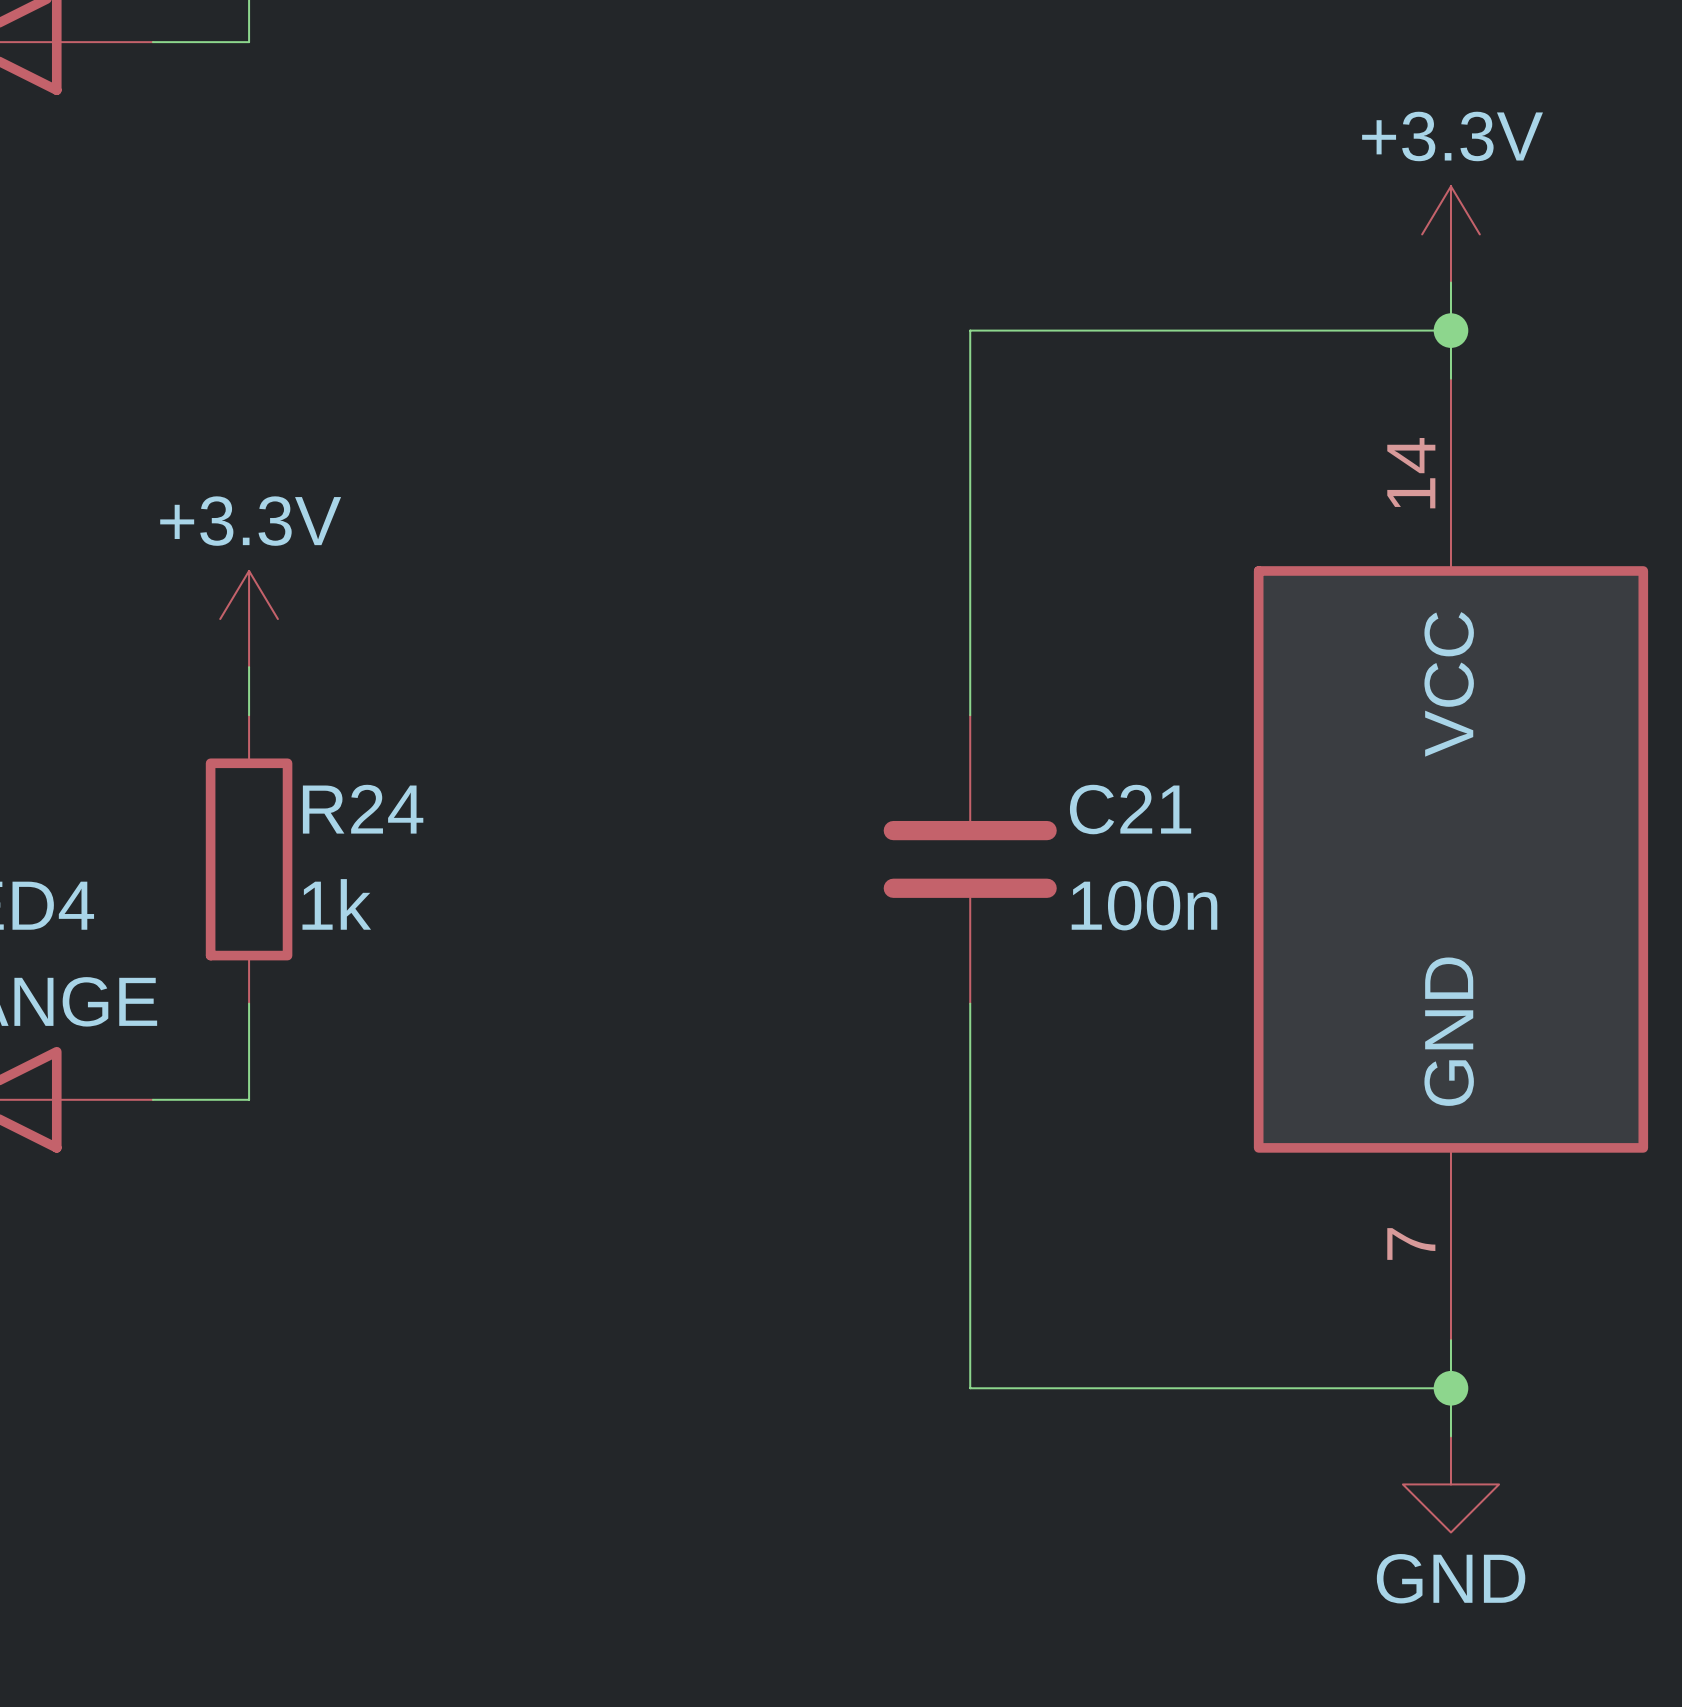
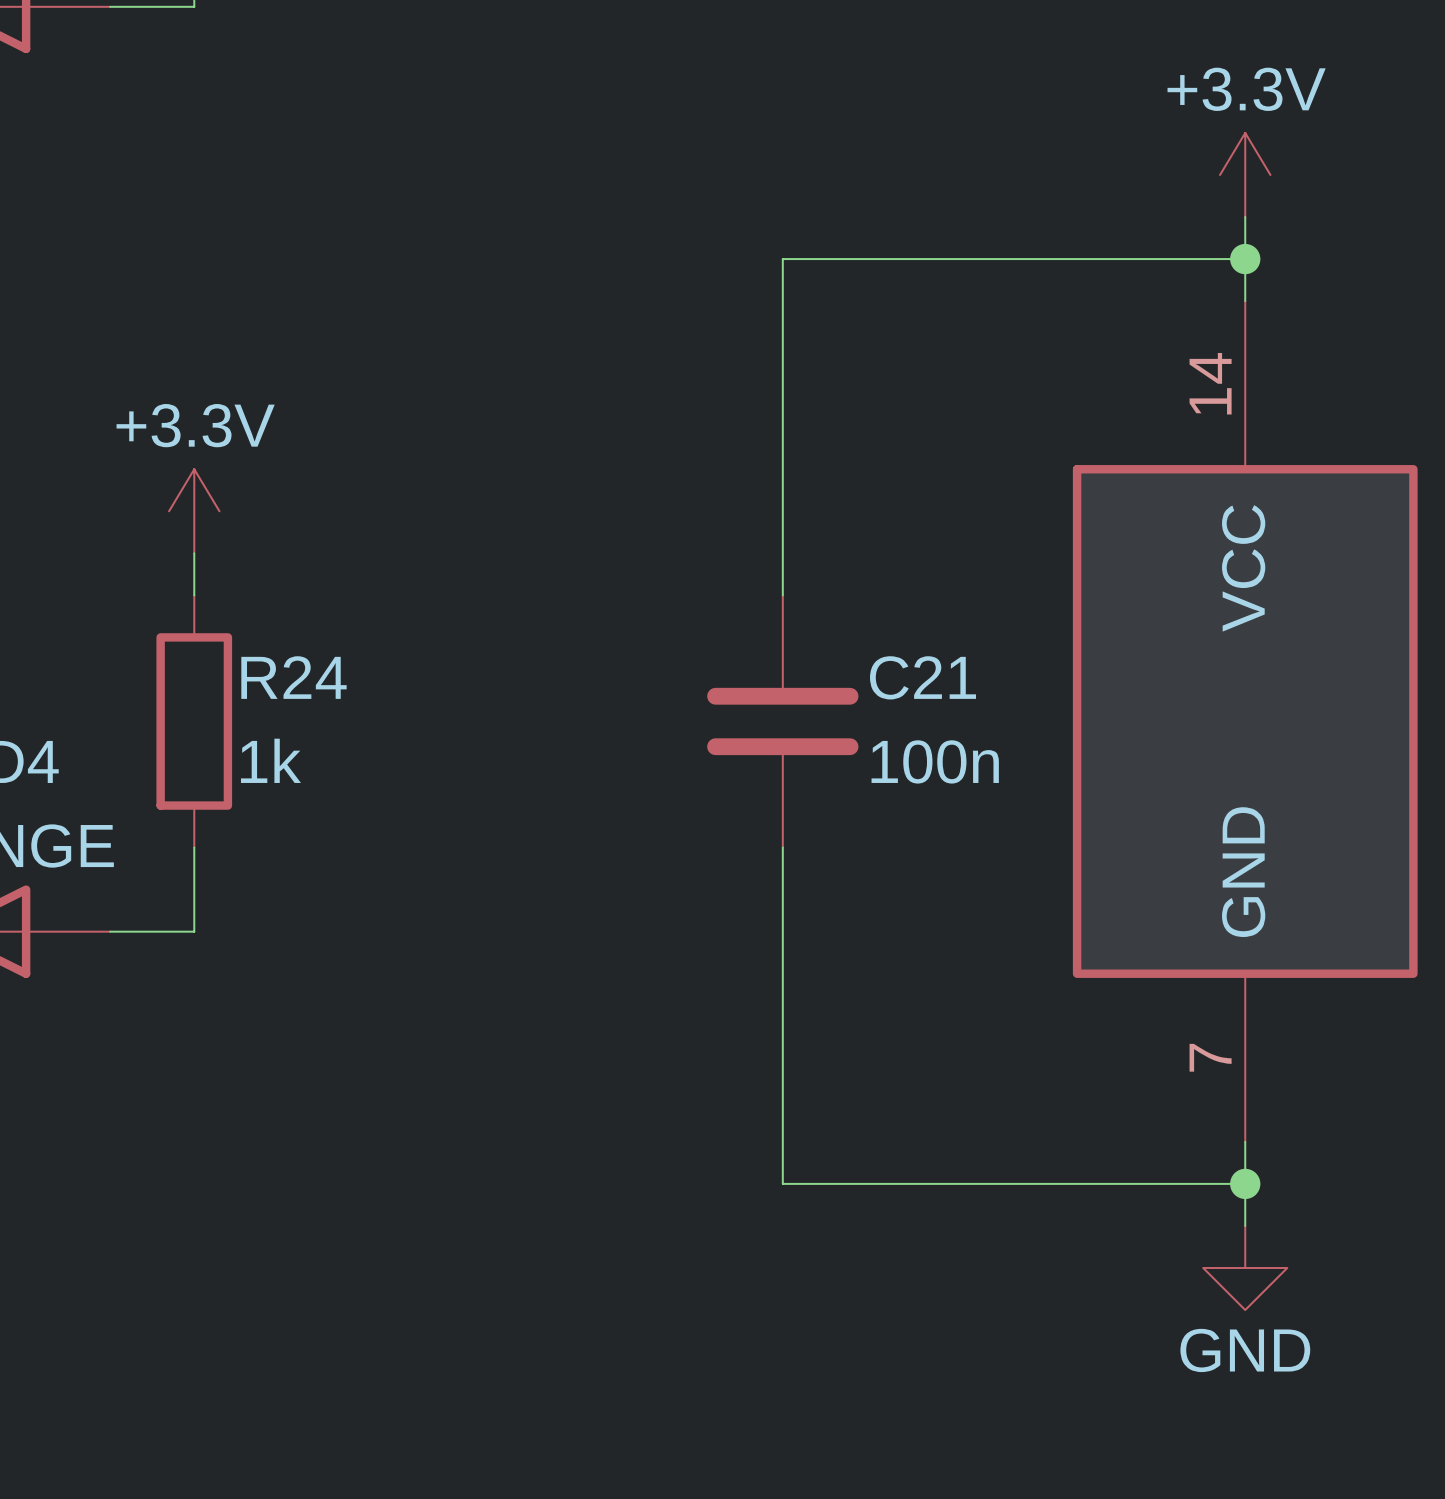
wire: (970, 330) (970, 715) -> (824, 259) (782, 259) (782, 595)
C21 position: (970, 859) -> (782, 721)
wire: (970, 1003) (970, 1388) -> (782, 847) (782, 1183) (824, 1183)

